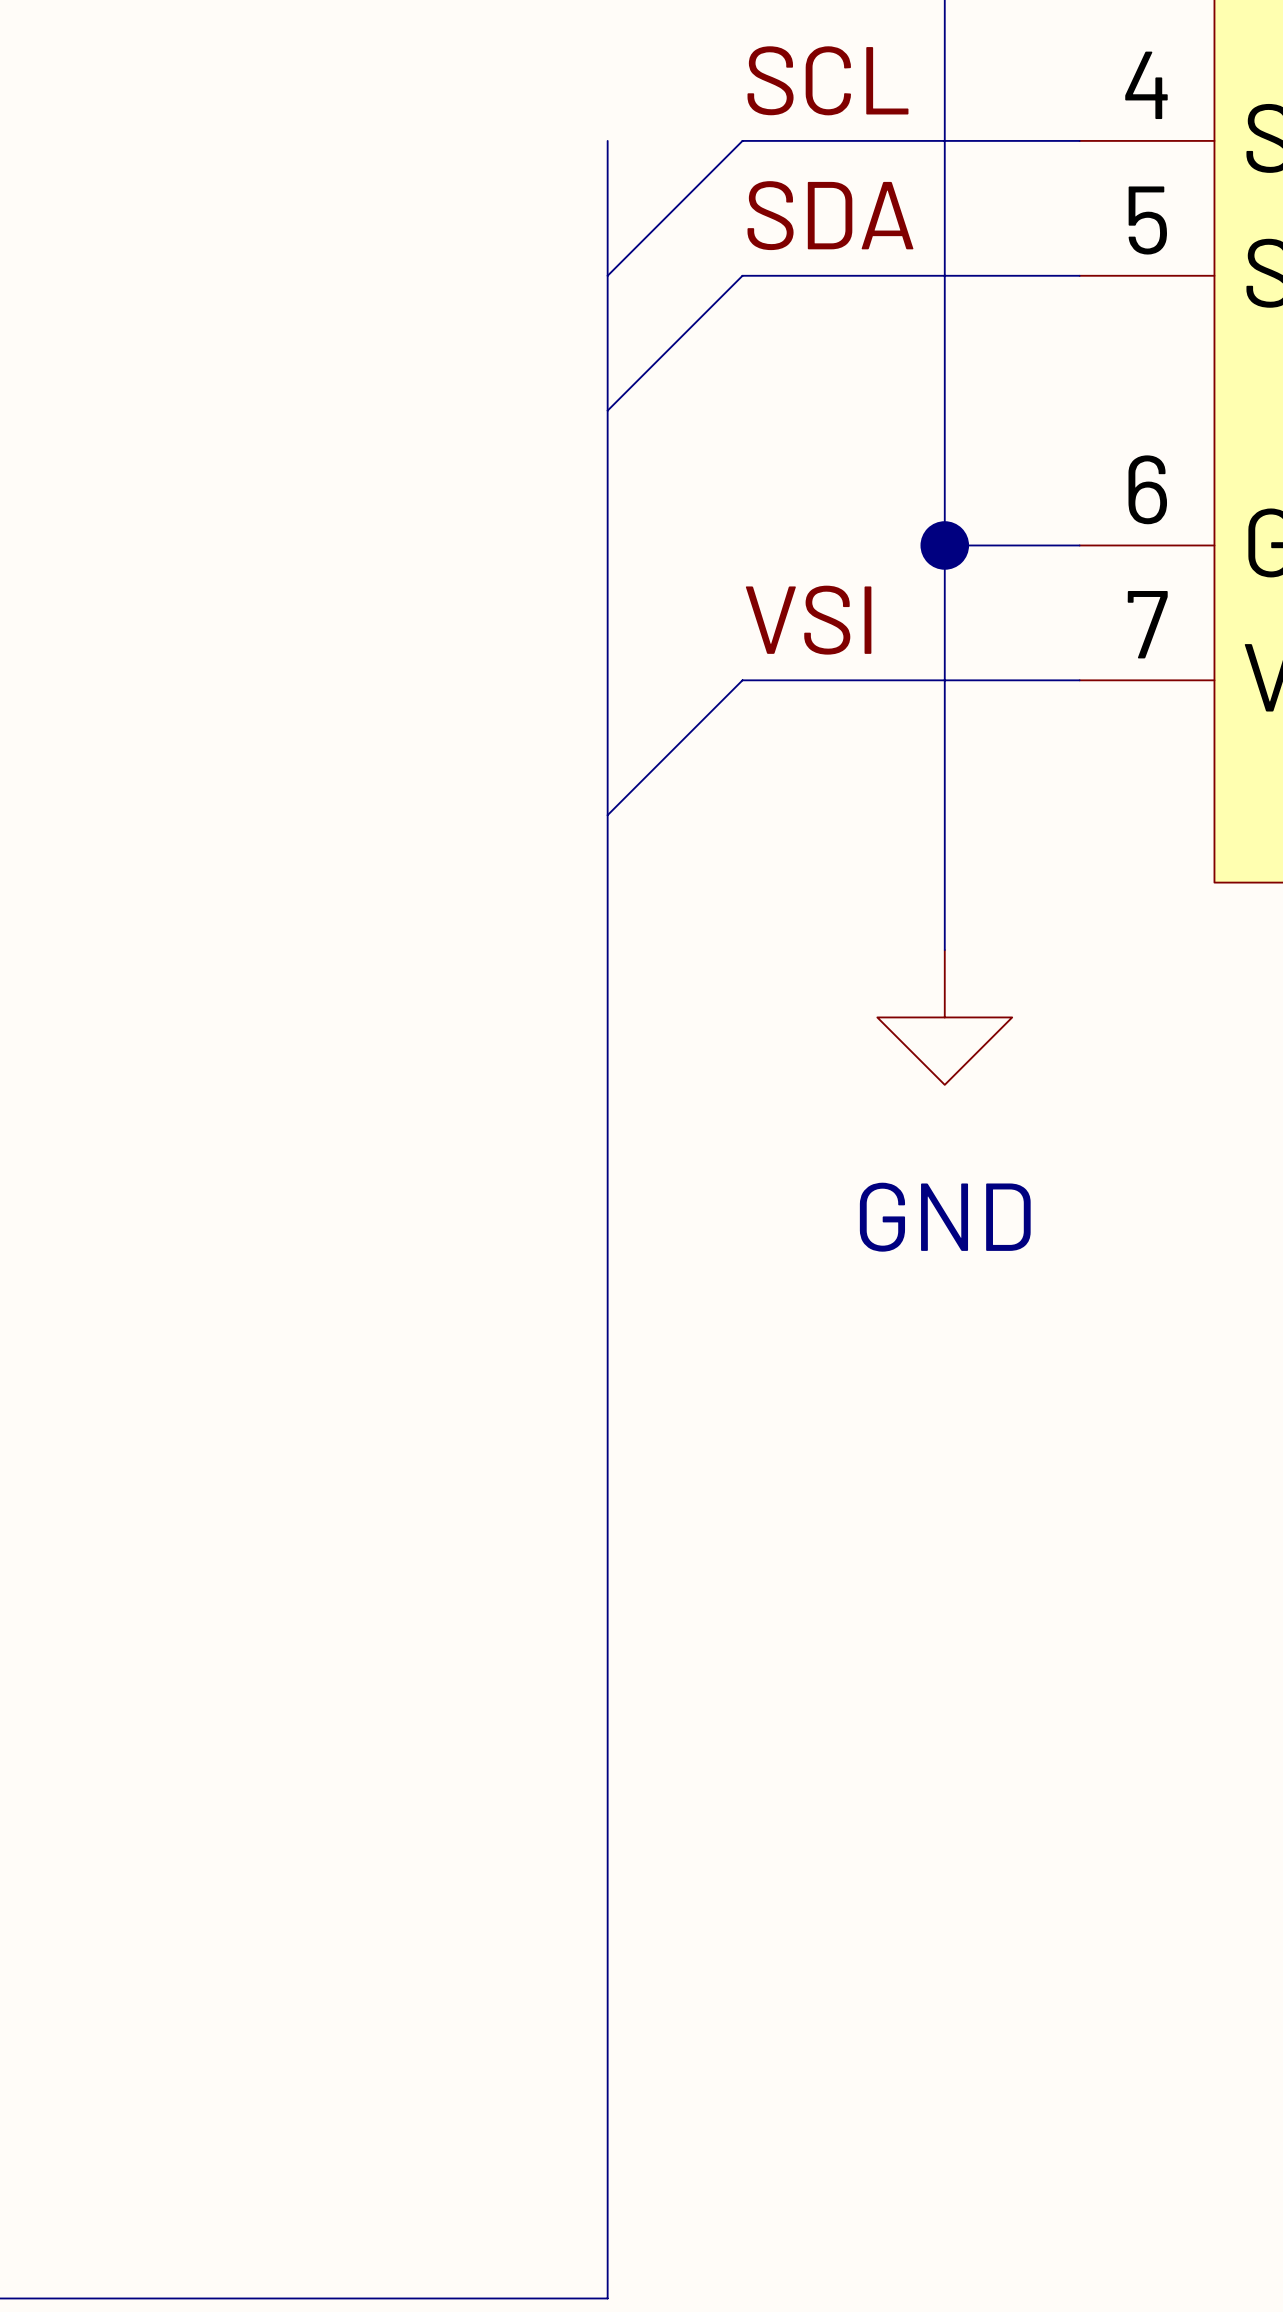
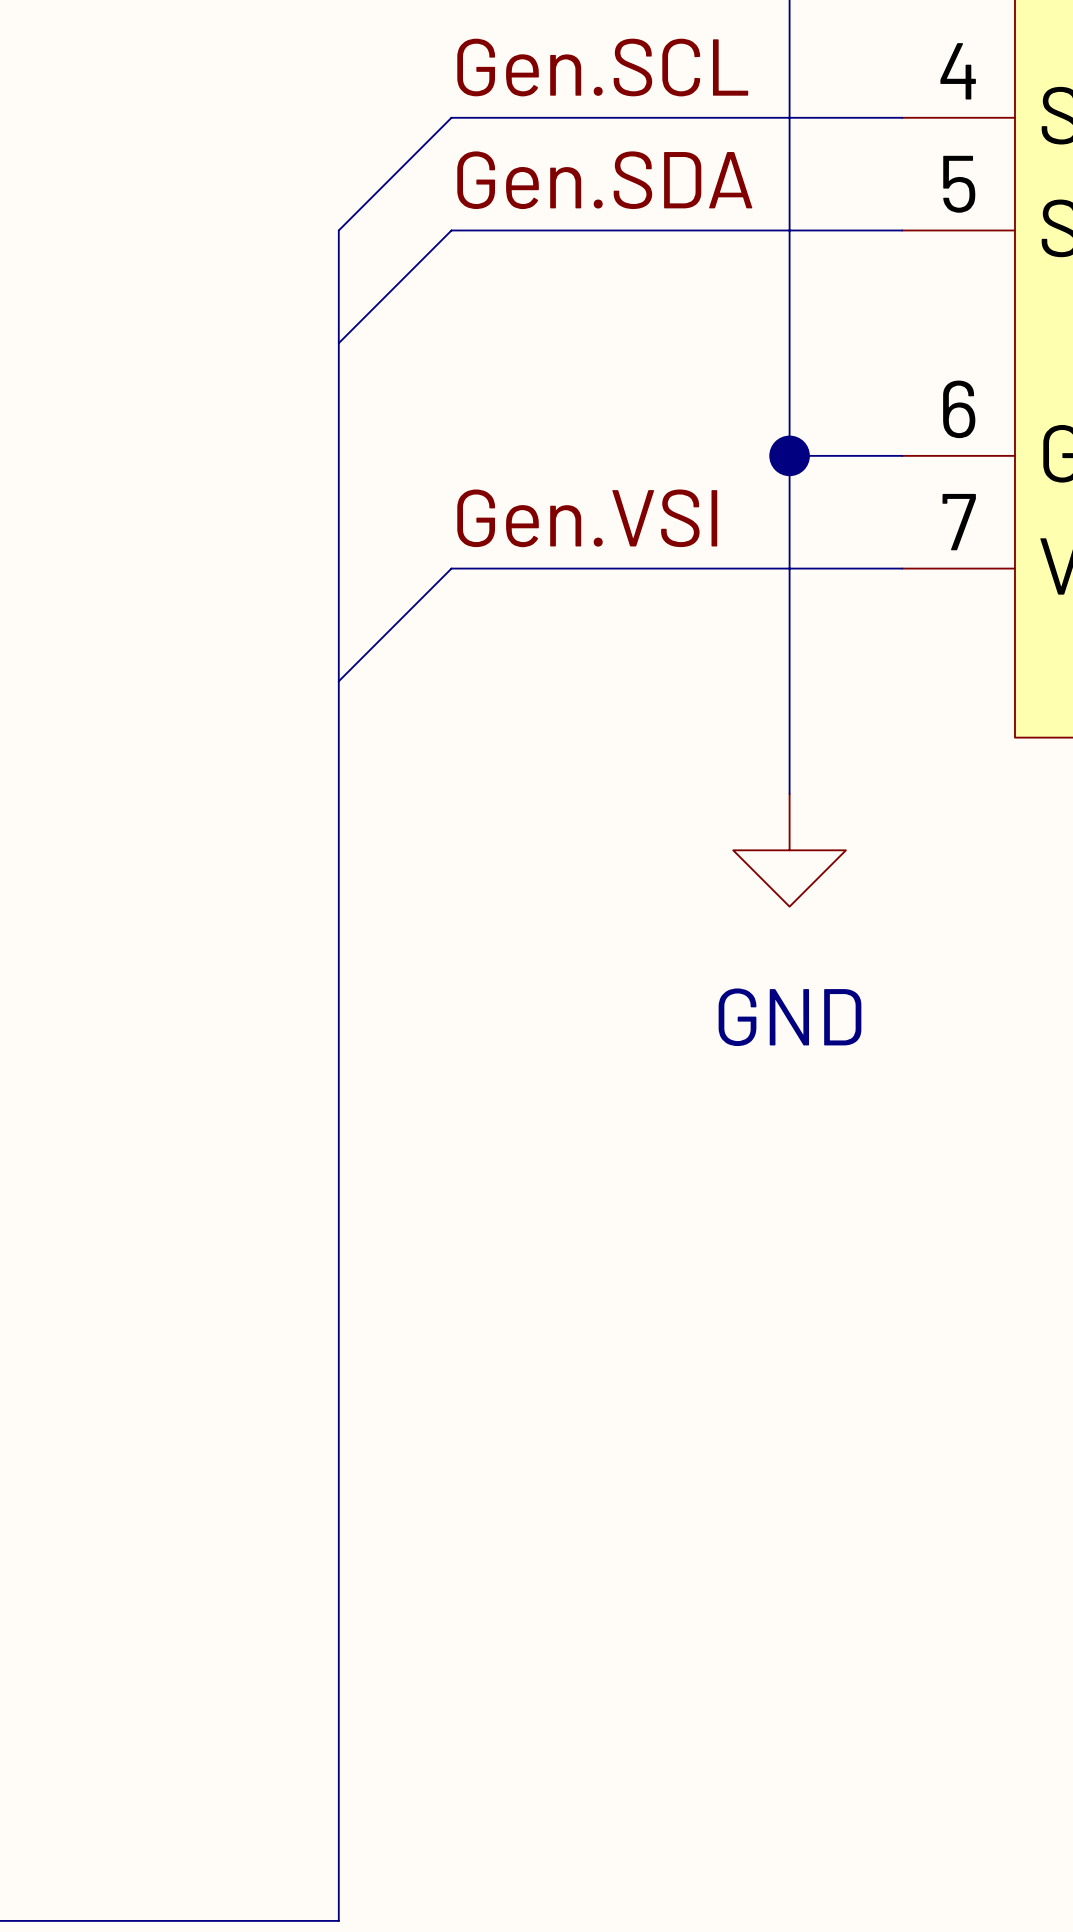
label: none -> Gen.SCL (602, 67)
label: SCL (827, 80) -> none
bus: (607, 140) (607, 2298) (405, 2298) -> (338, 230) (338, 1920)
wire: (742, 140) (607, 275) -> (620, 117) (451, 117) (338, 230)
label: none -> Gen.SDA (604, 180)
label: SDA (830, 215) -> none
wire: (742, 275) (607, 410) -> (620, 230) (451, 230) (338, 343)
label: none -> Gen.VSI (587, 518)
label: VSI (808, 620) -> none
wire: (742, 680) (607, 815) -> (620, 568) (451, 568) (338, 681)

